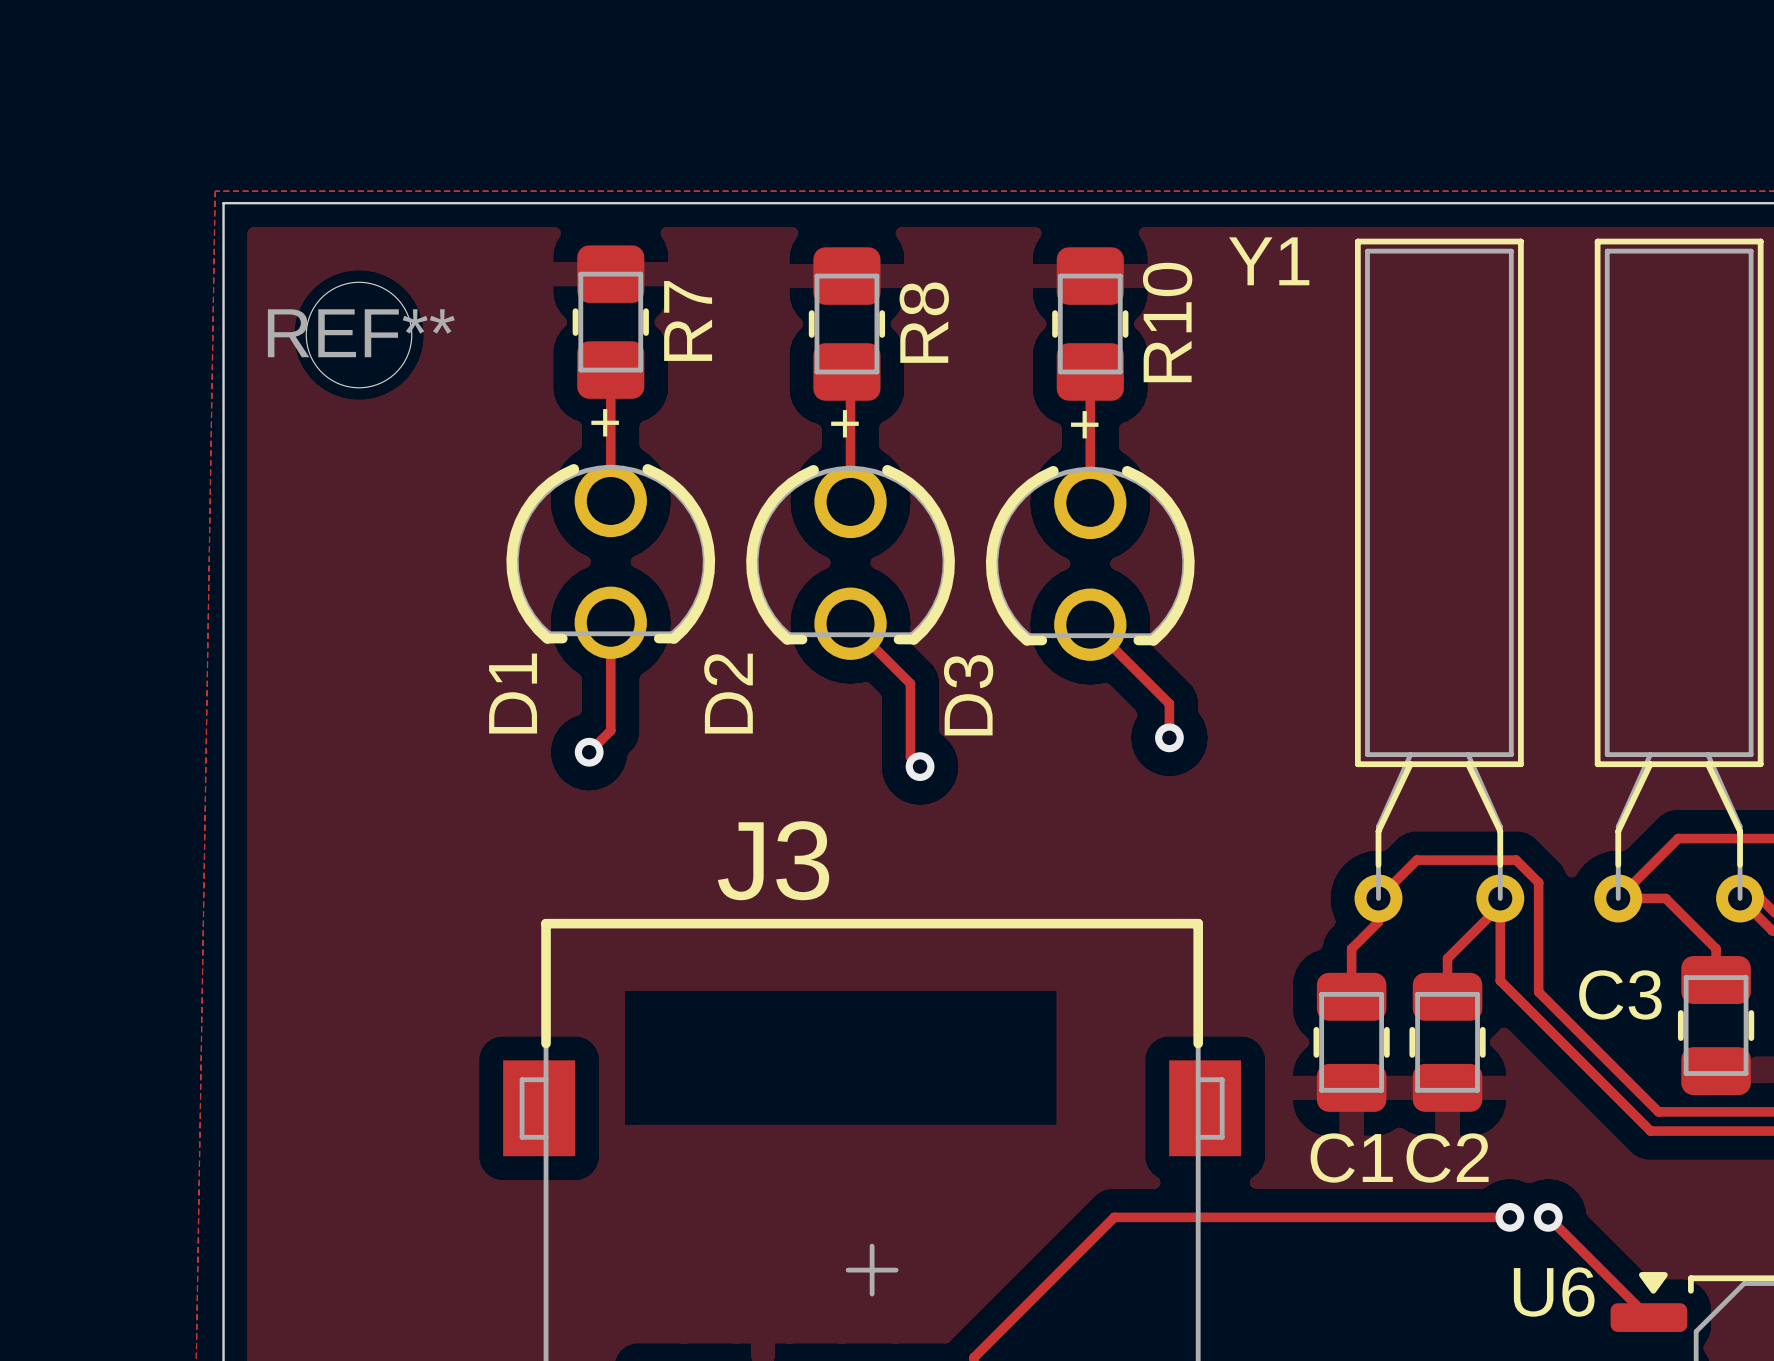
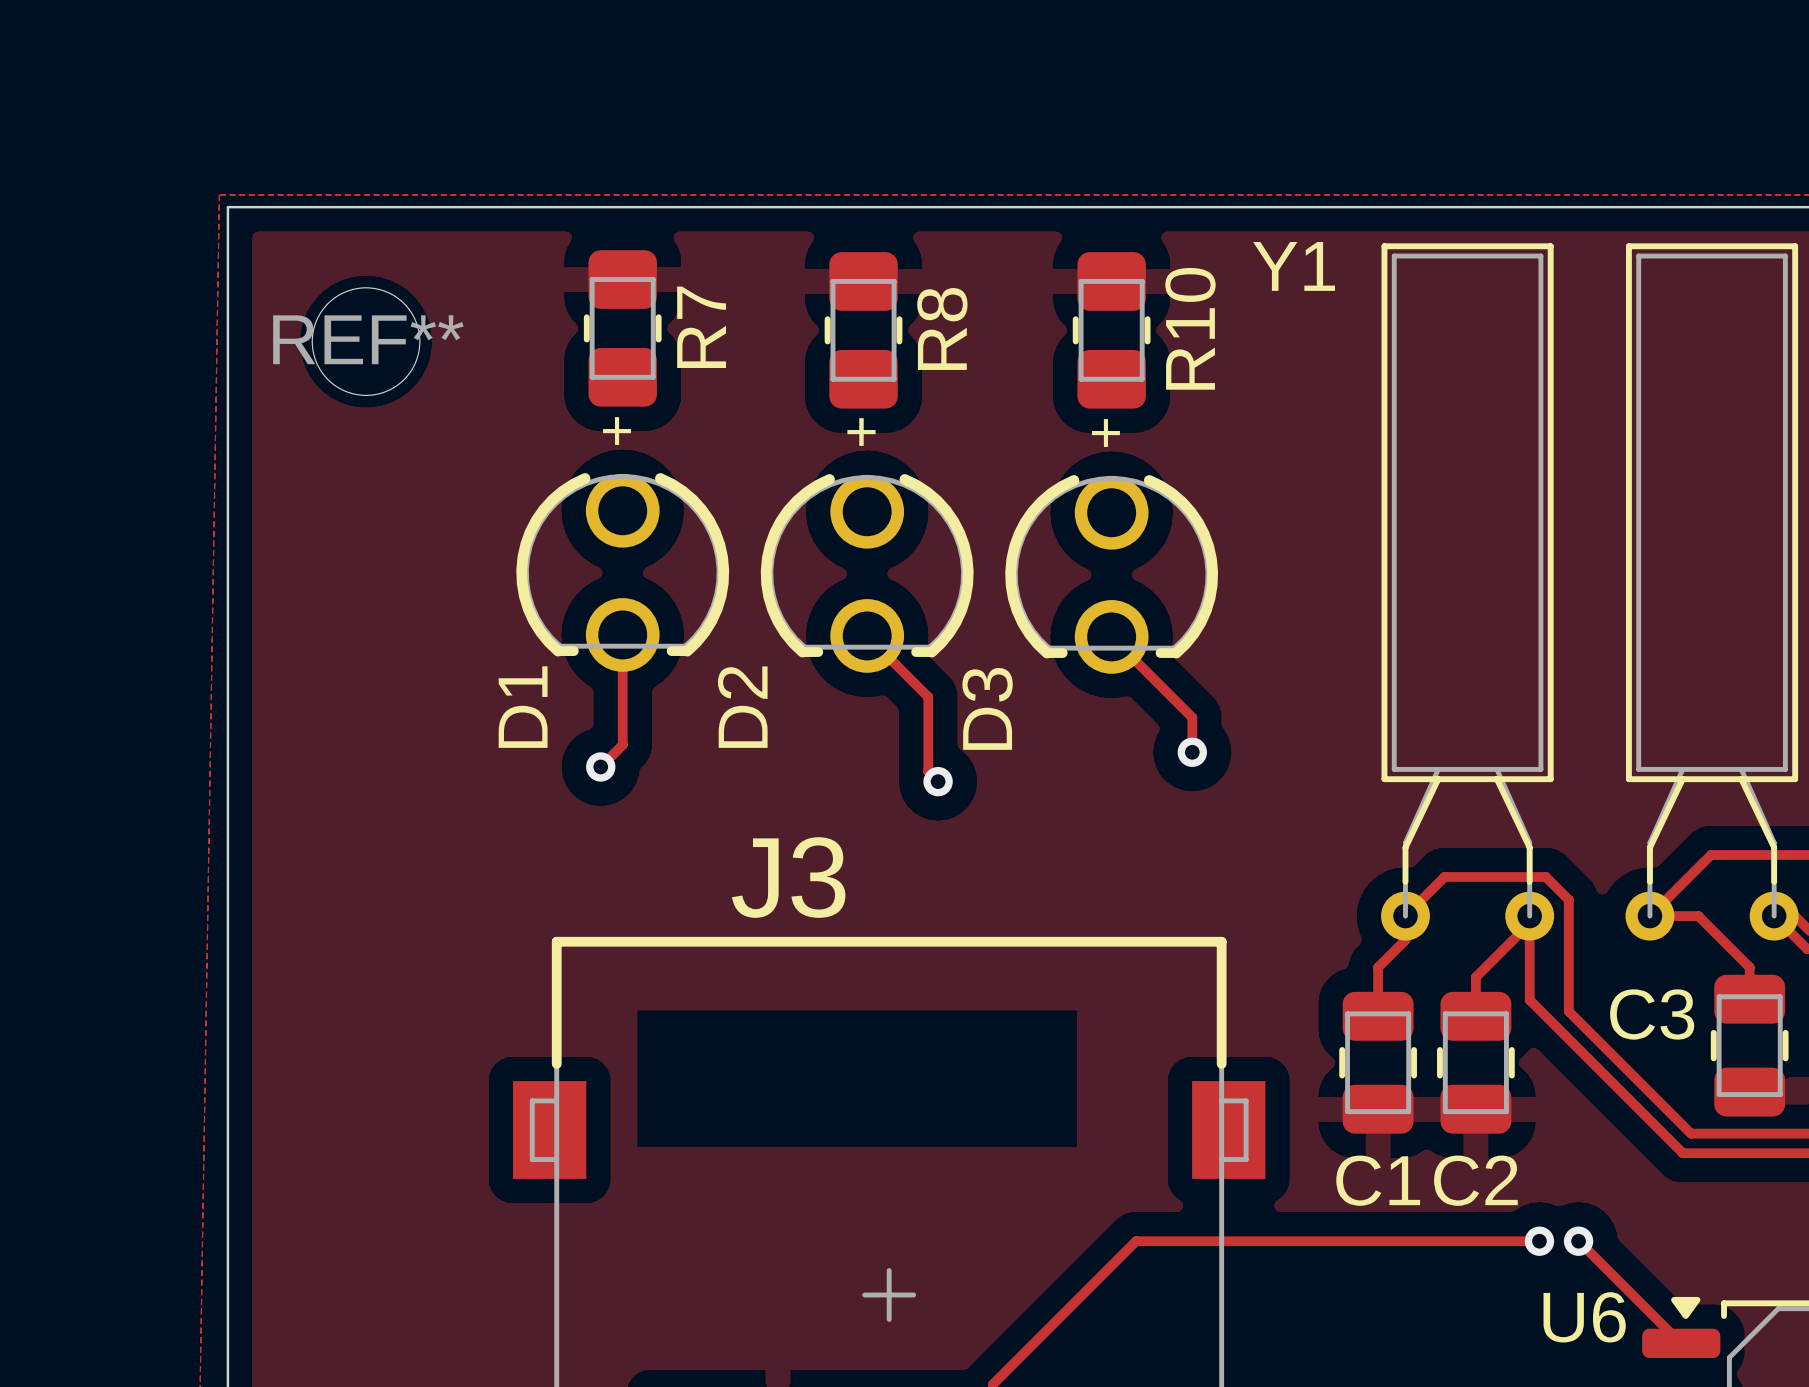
track: (610, 370) (610, 500) -> none
track: (846, 371) (850, 375) (850, 501) -> none
track: (1090, 371) (1090, 502) -> none

